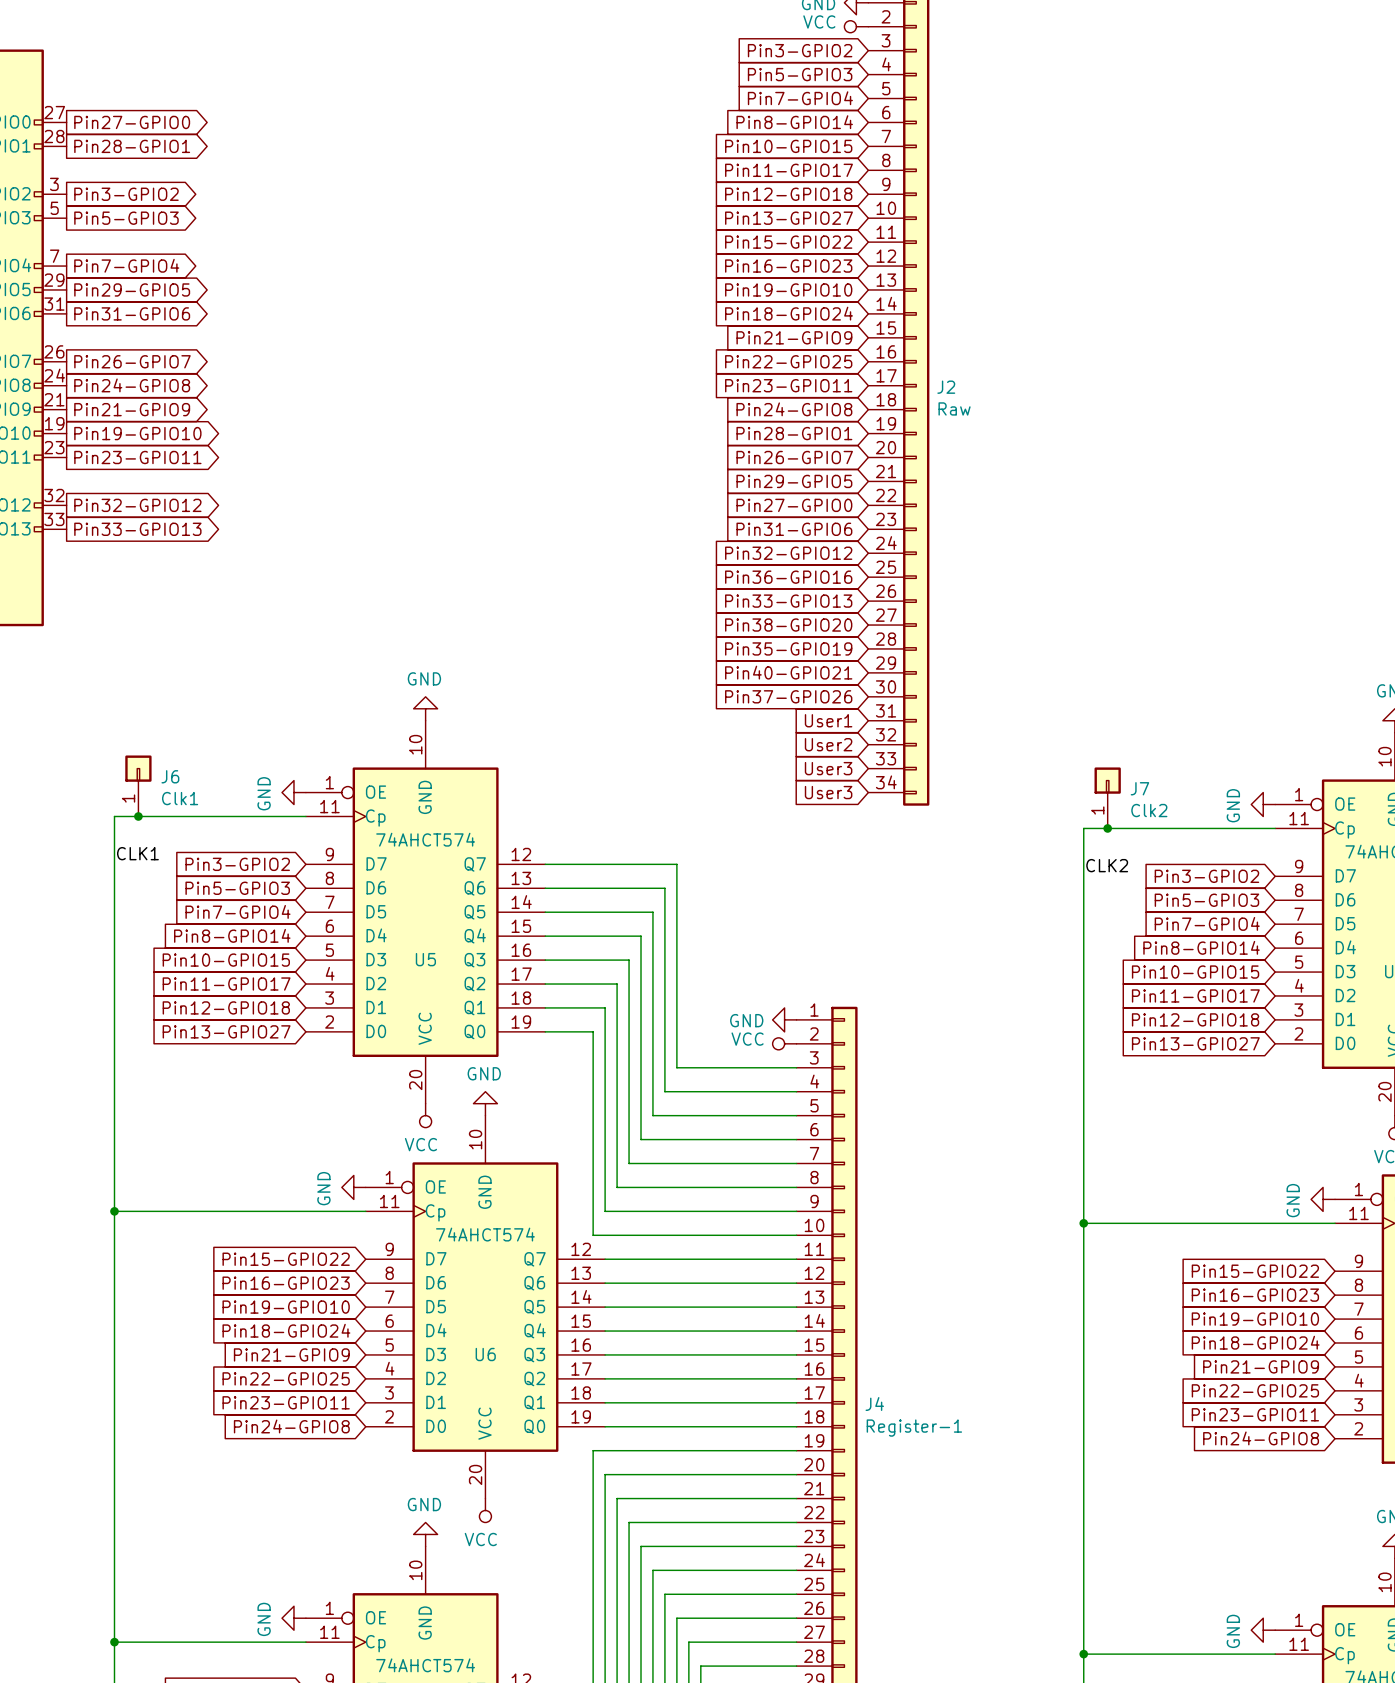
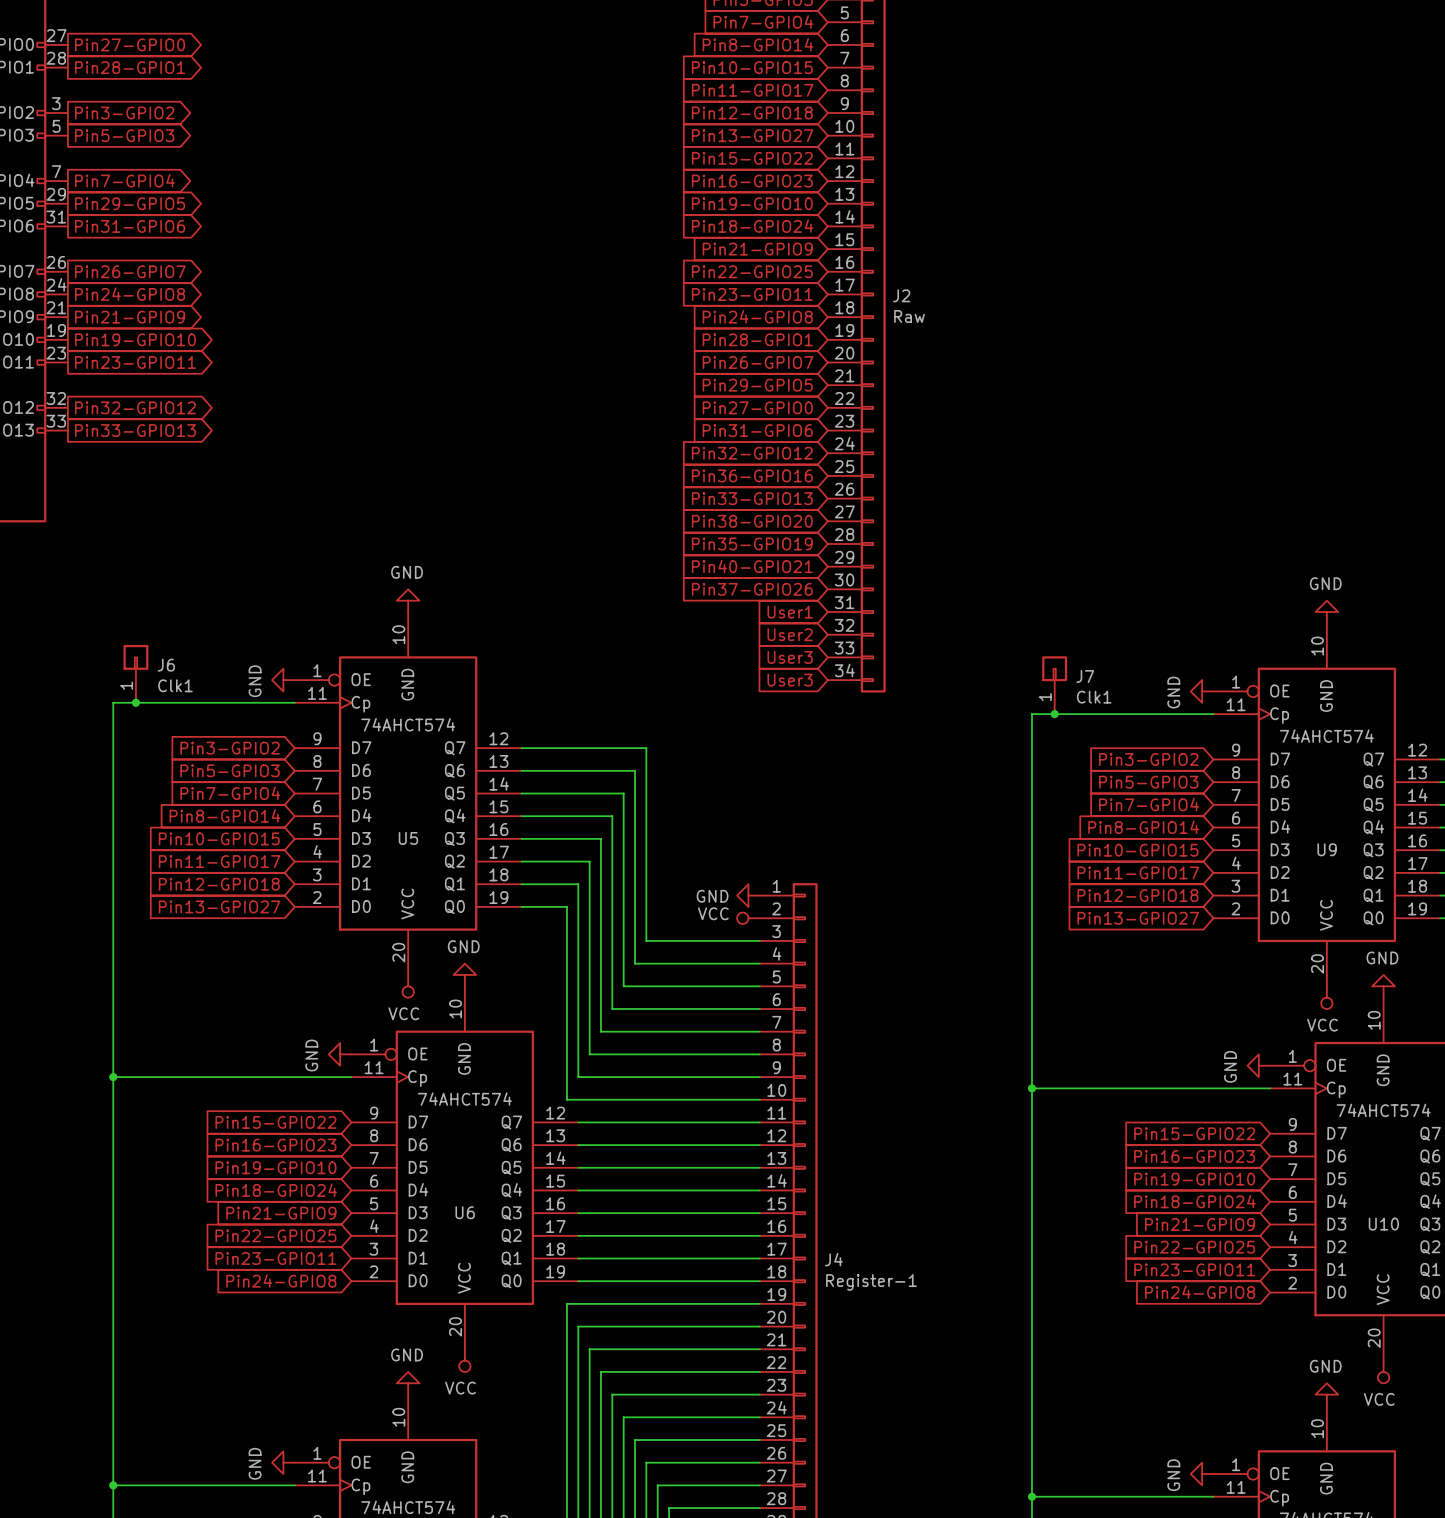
J7 value: Clk2 (1149, 810) -> Clk1 (1094, 697)
label: CLK1 (137, 853) -> none
label: CLK2 (1107, 865) -> none

